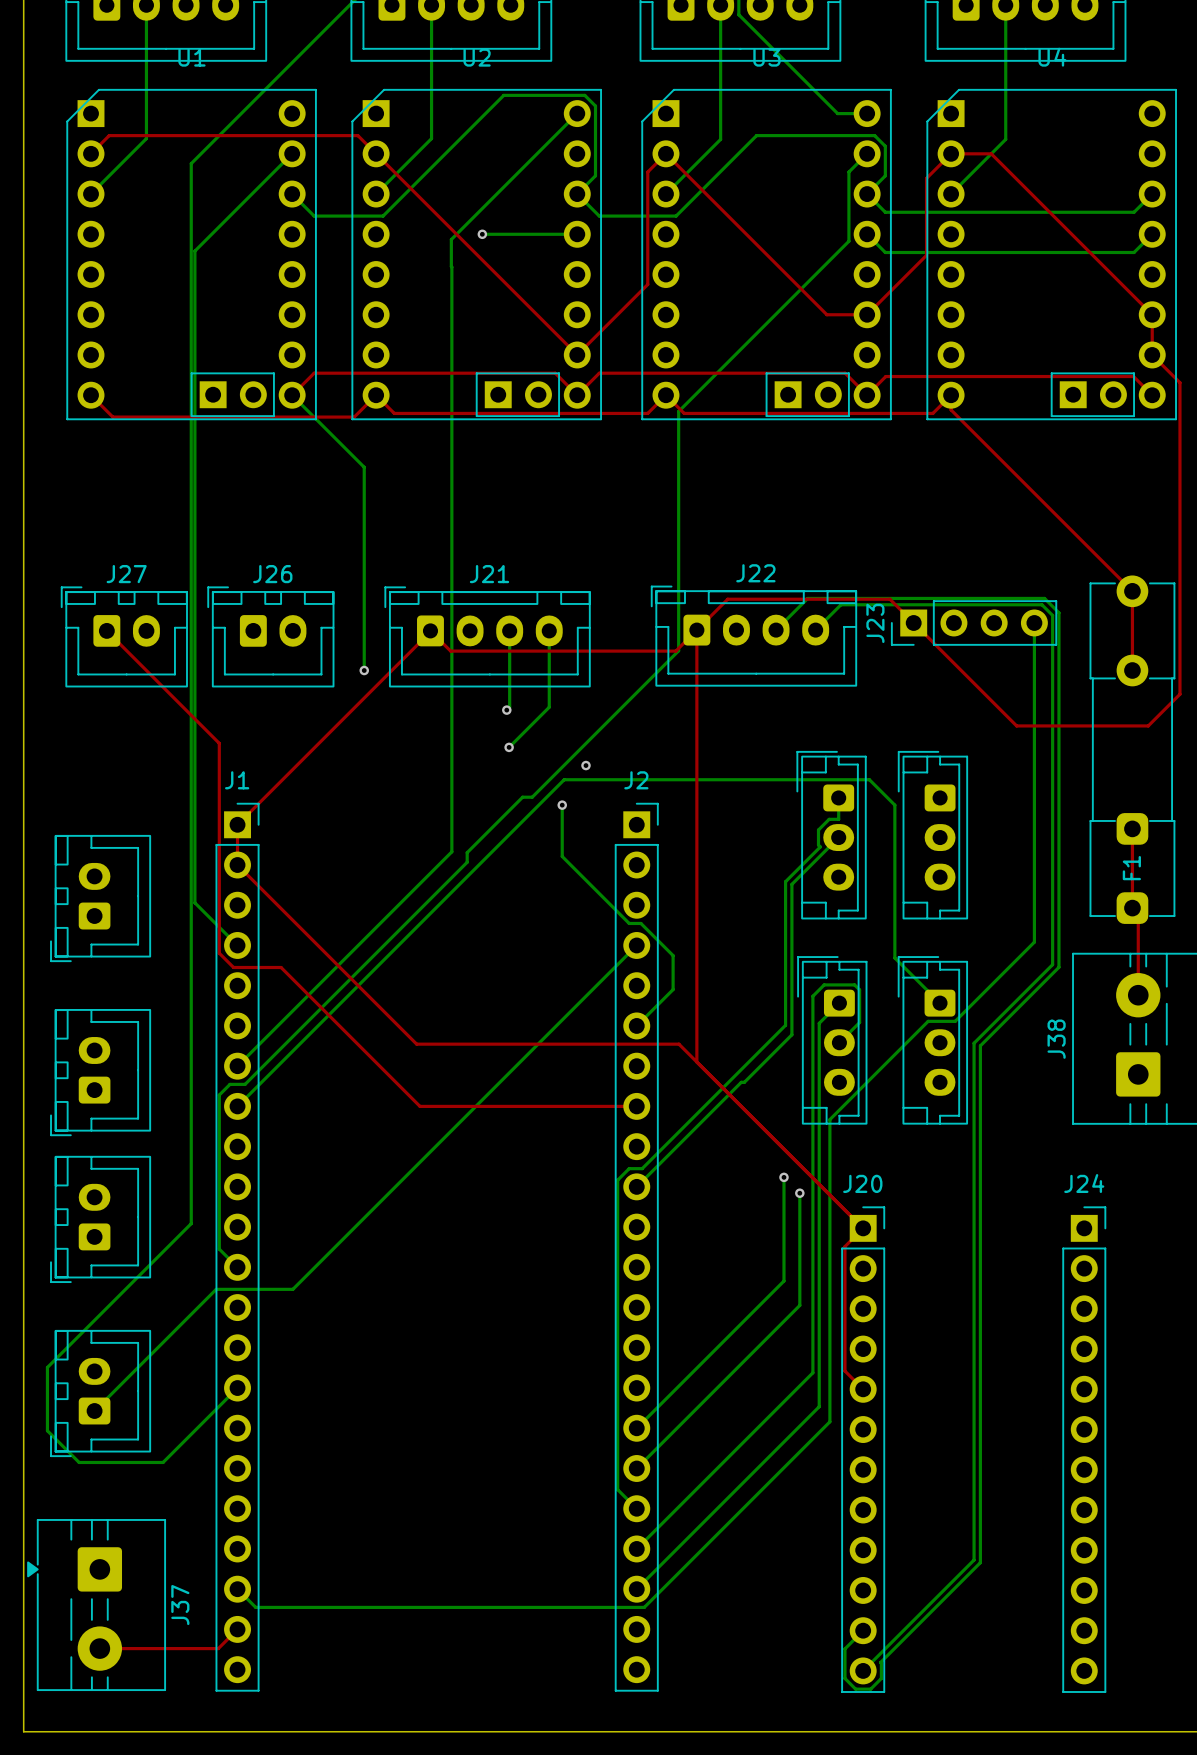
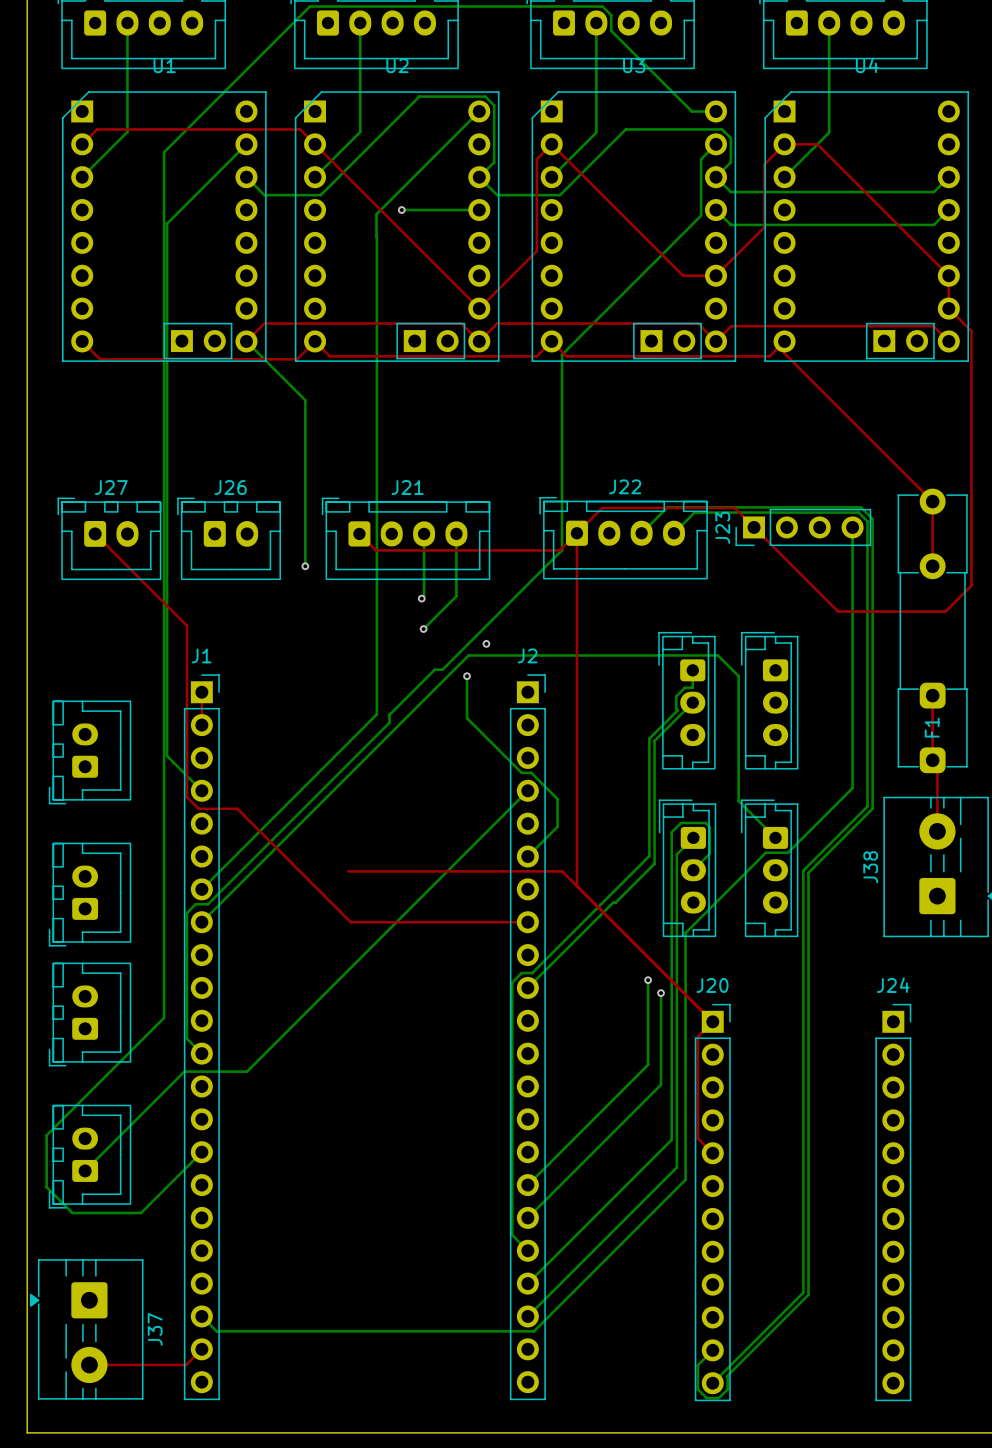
top track: (430, 631) (237, 824) -> none
top track: (237, 865) (416, 1044) -> none

